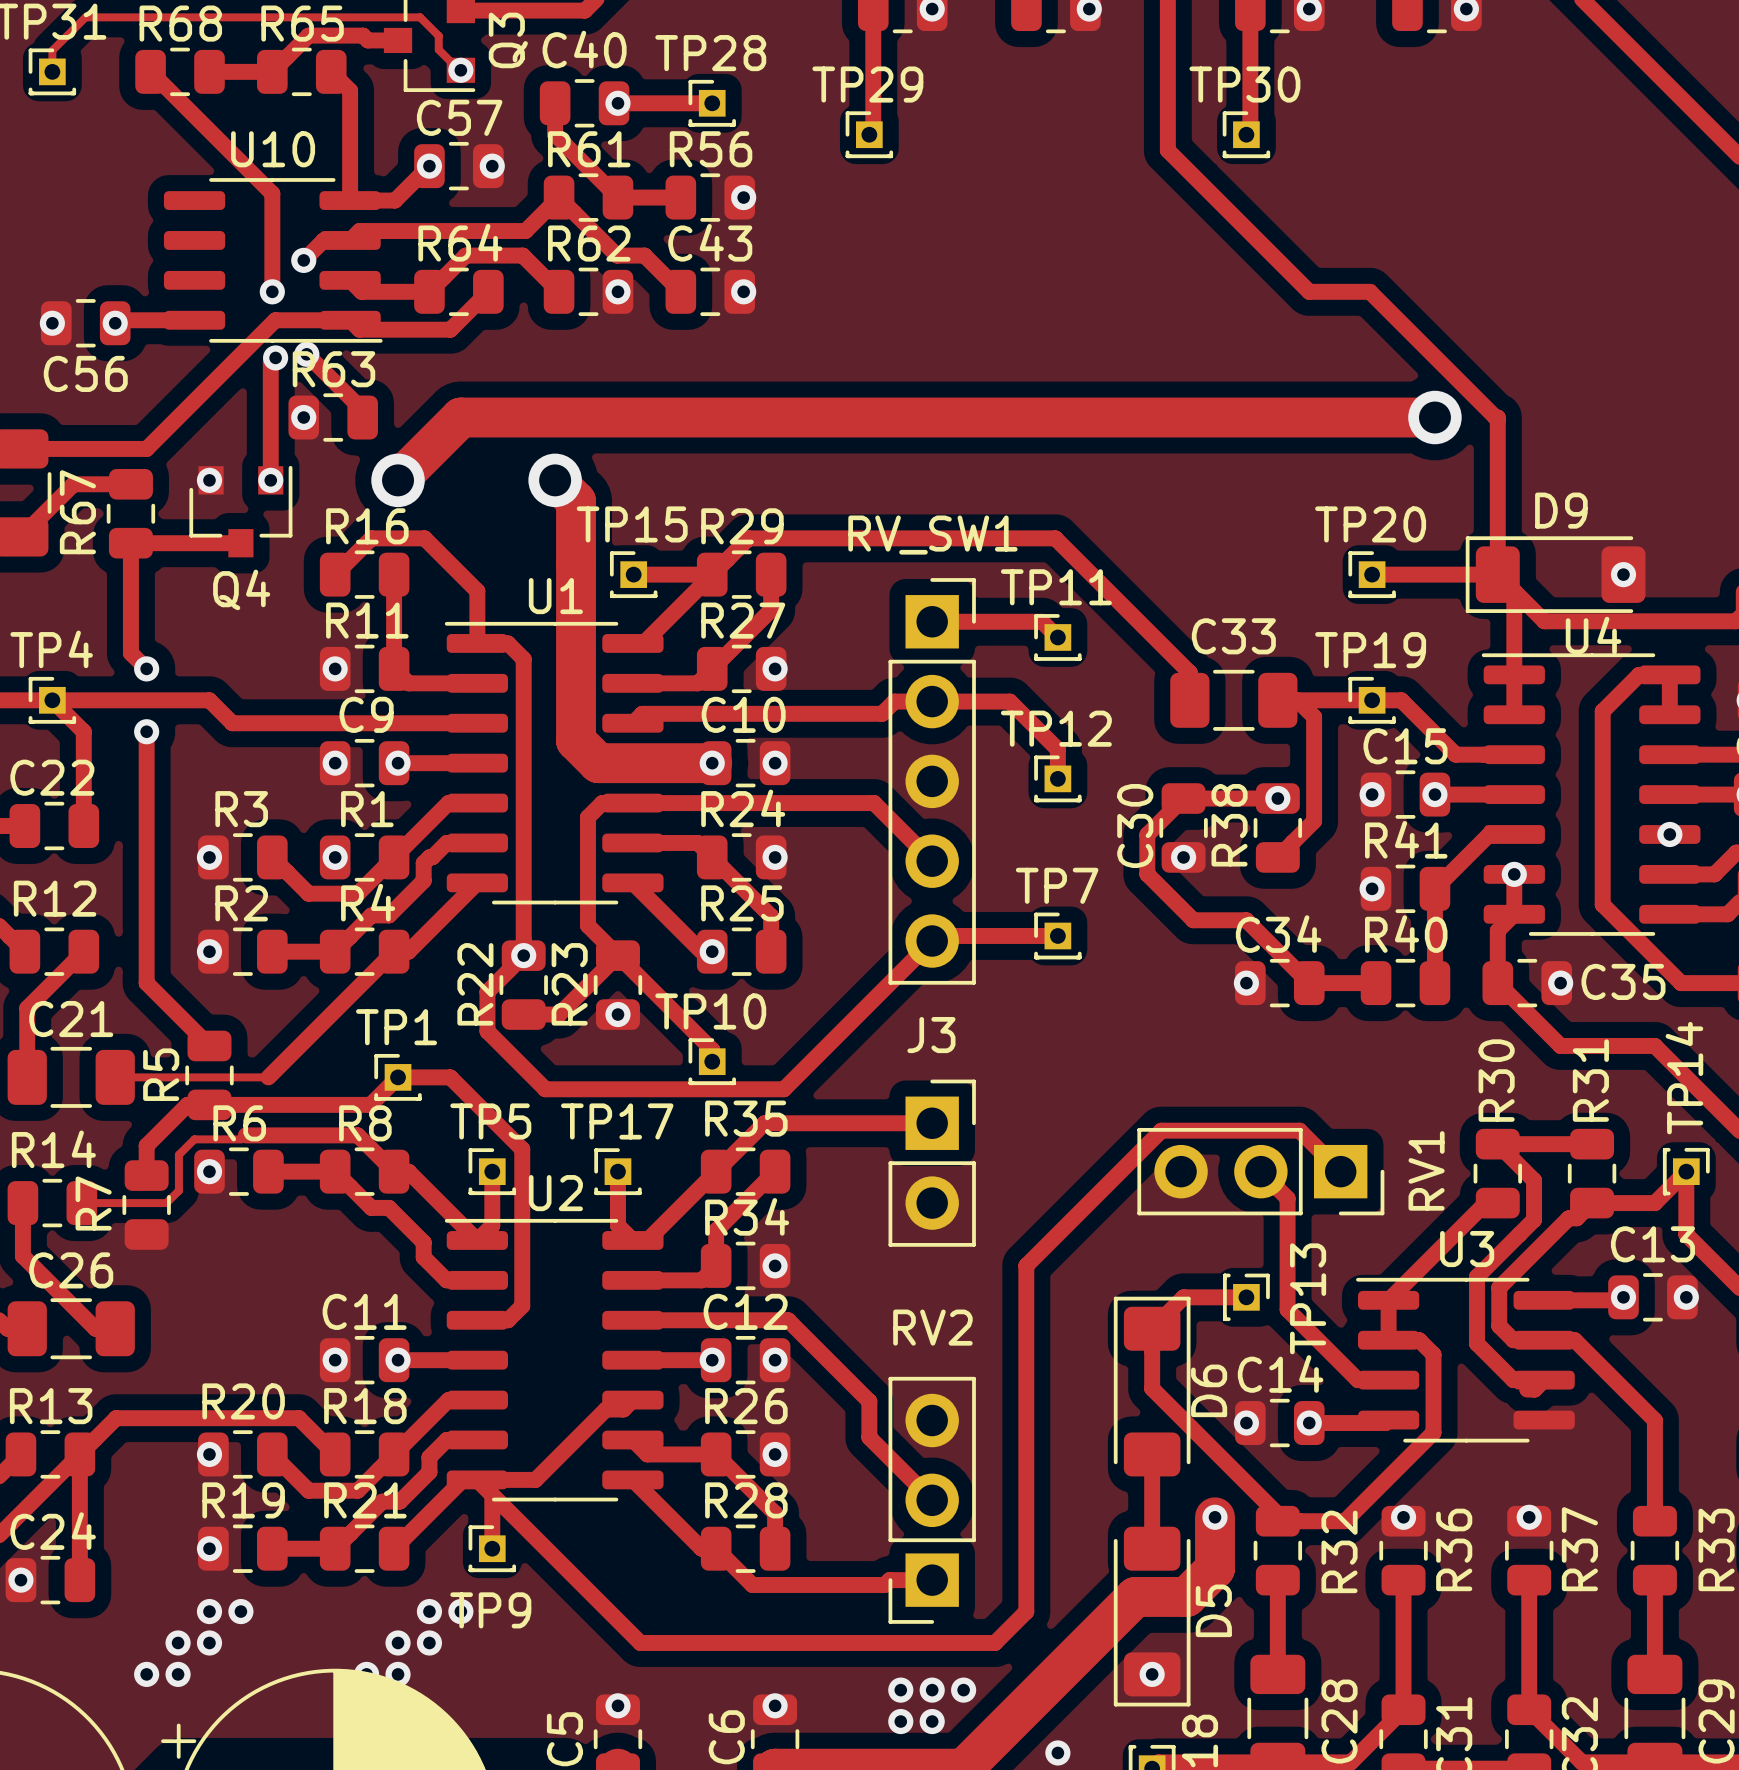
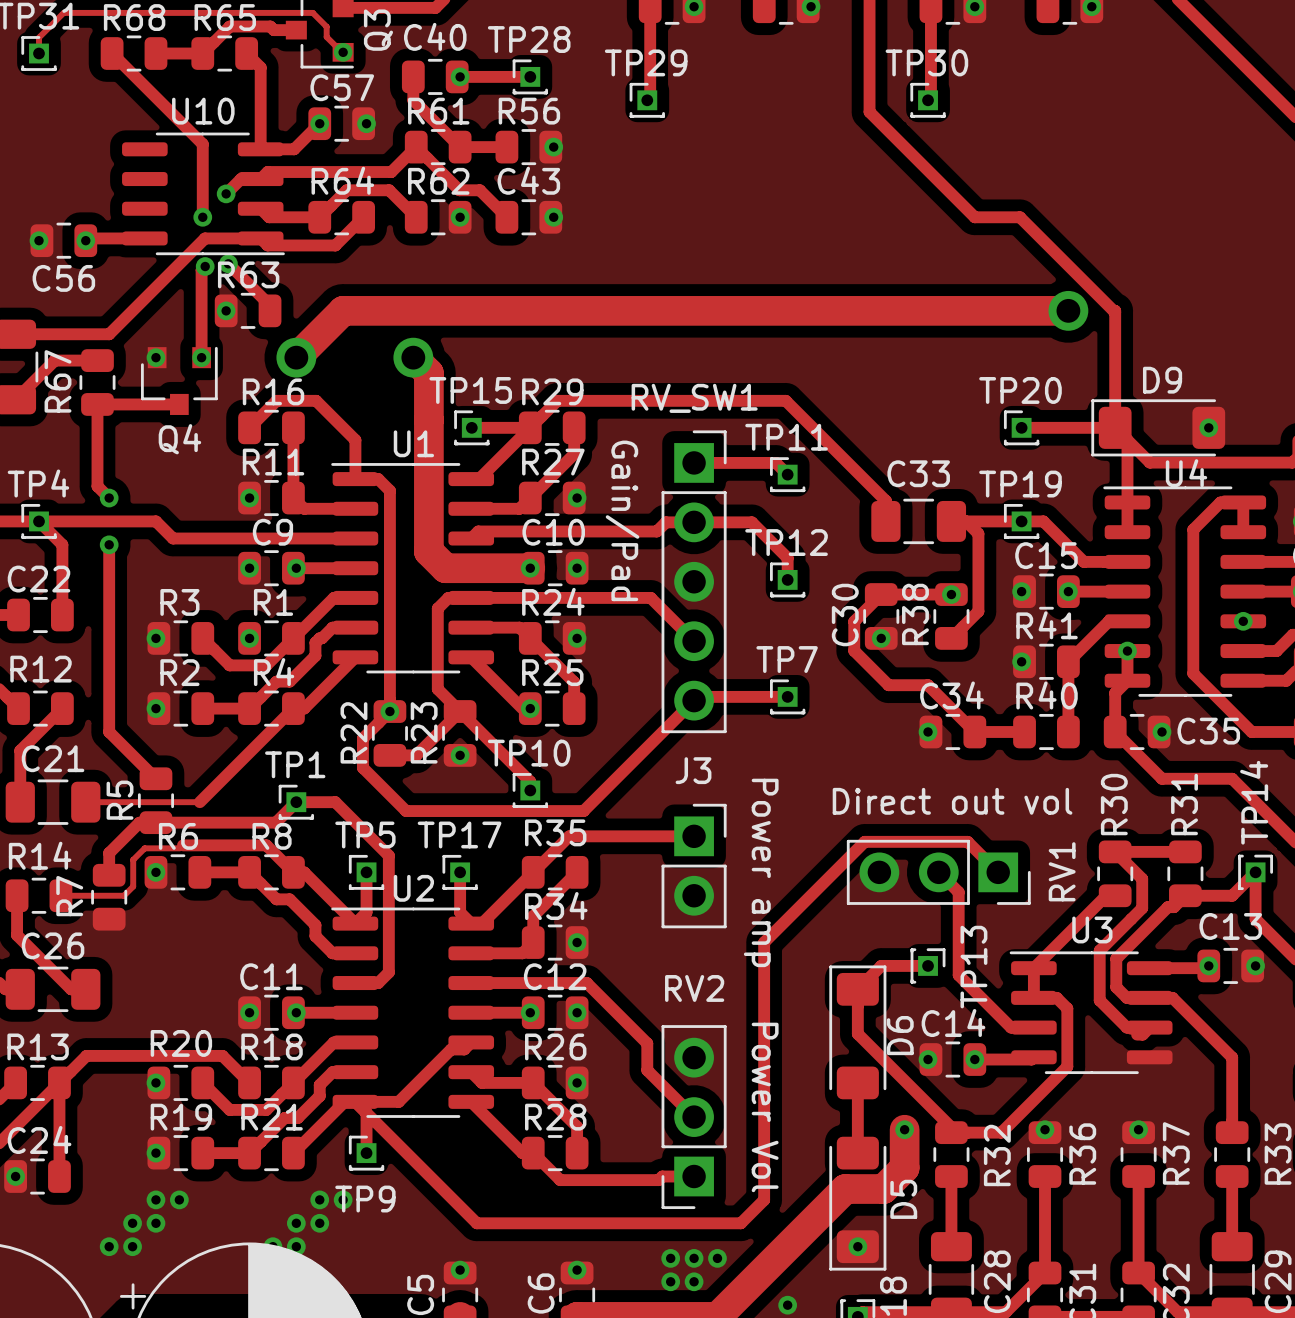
text: none -> Gain/Pad (622, 520)
text: none -> Direct out vol (952, 801)
text: none -> Power amp (761, 872)
text: none -> Power Vol (765, 1107)

